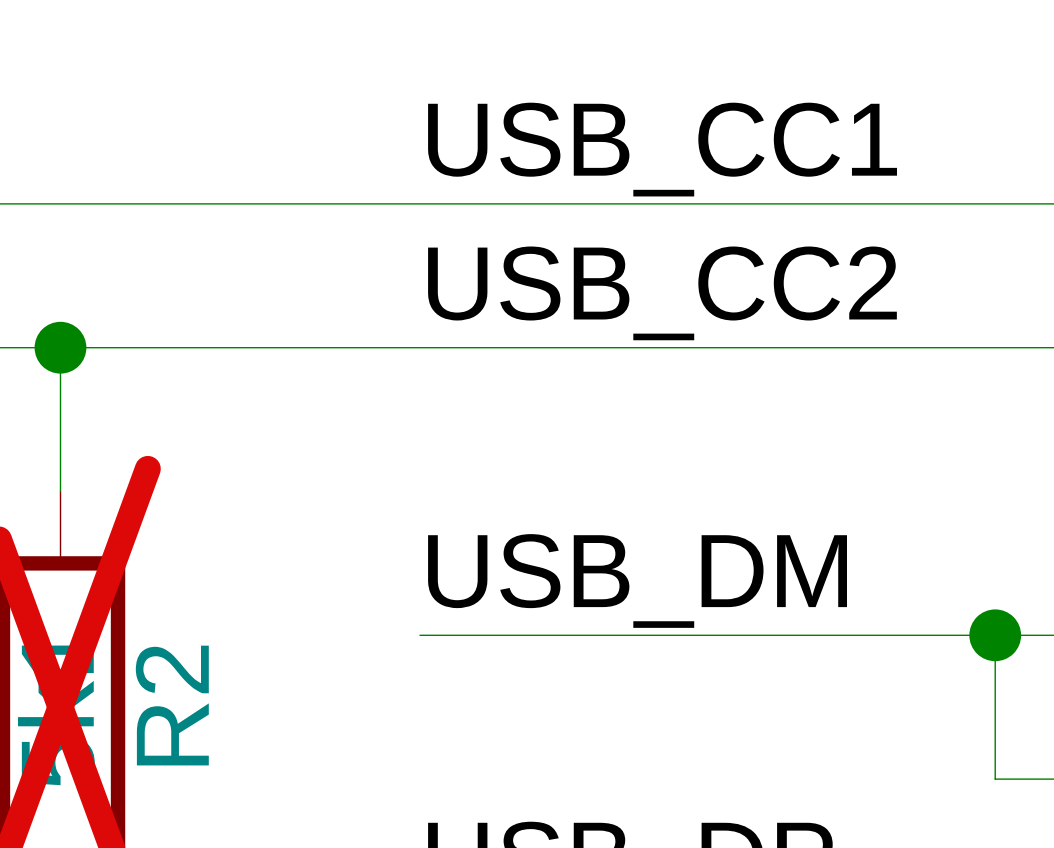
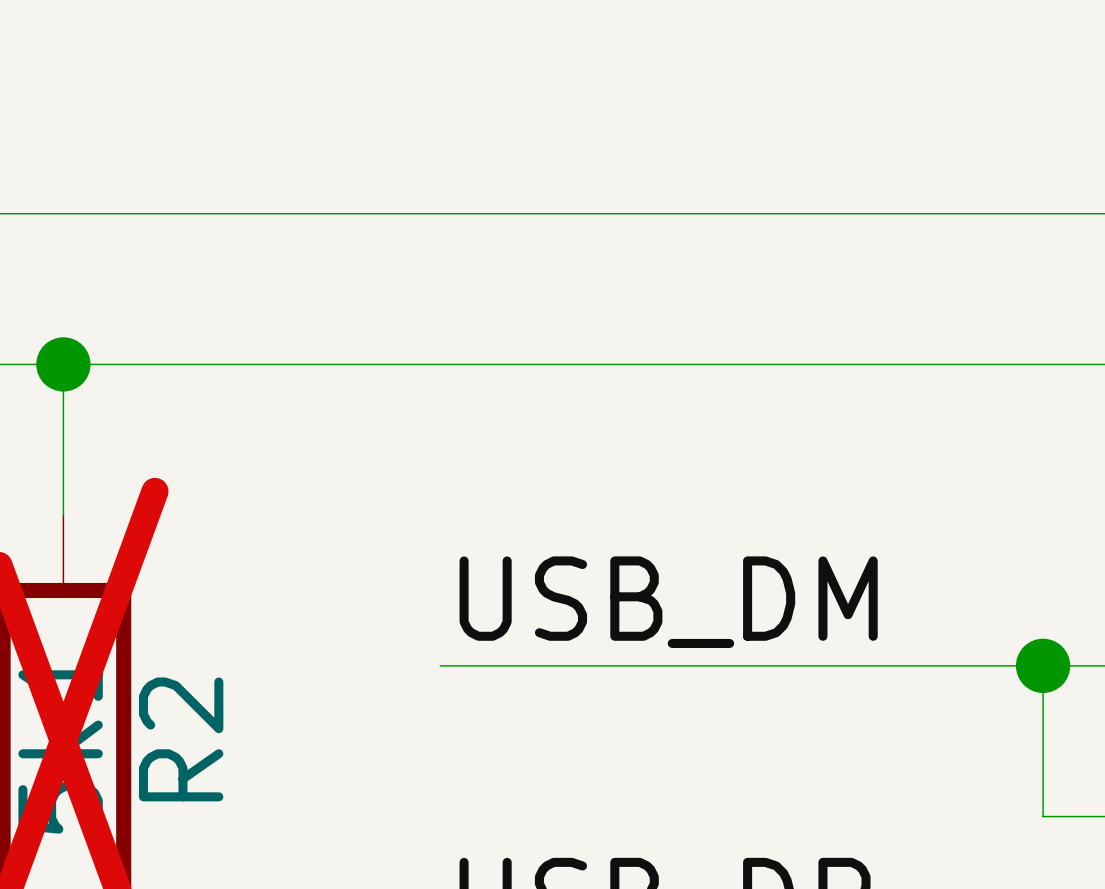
label: USB_CC1 (662, 149) -> none
label: USB_CC2 (662, 293) -> none

